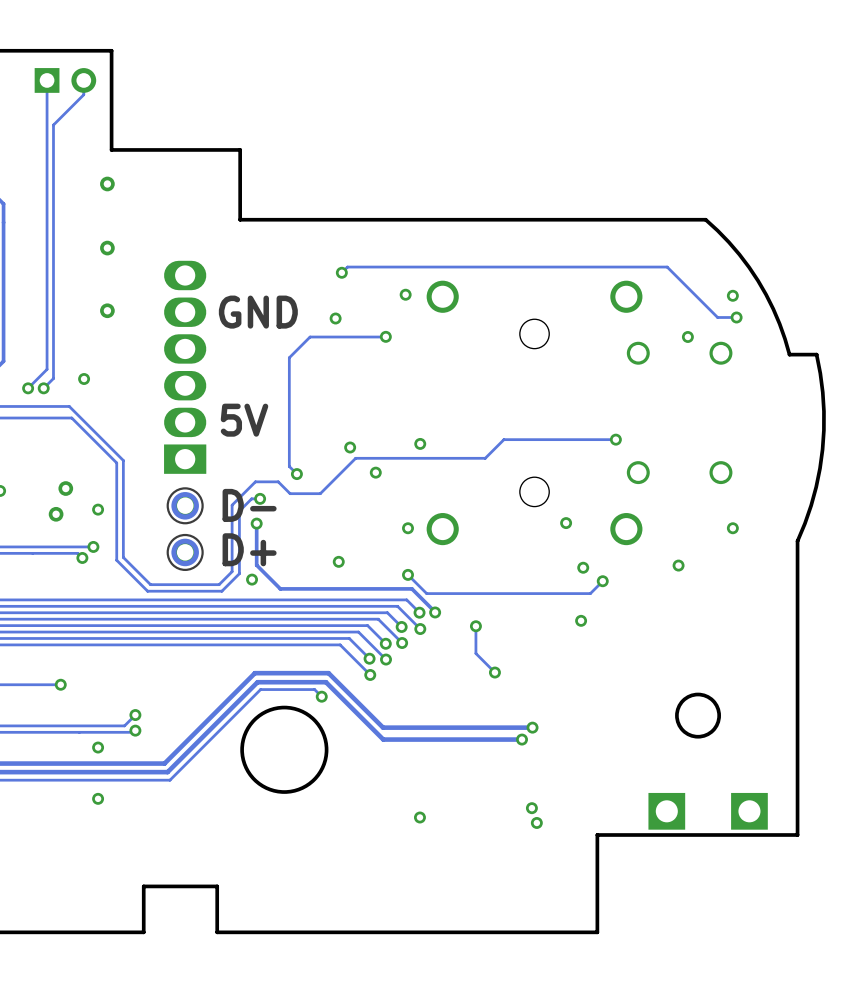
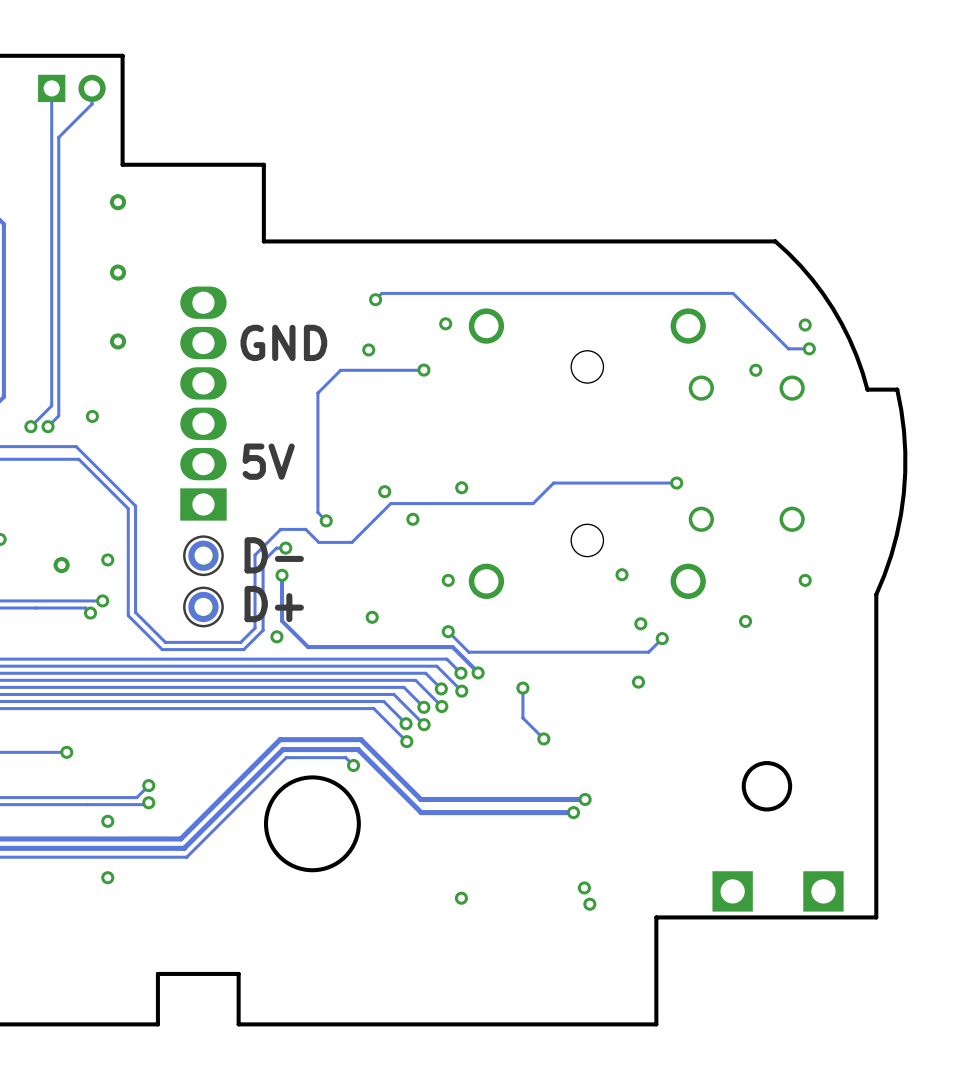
via: (65, 488) -> none

